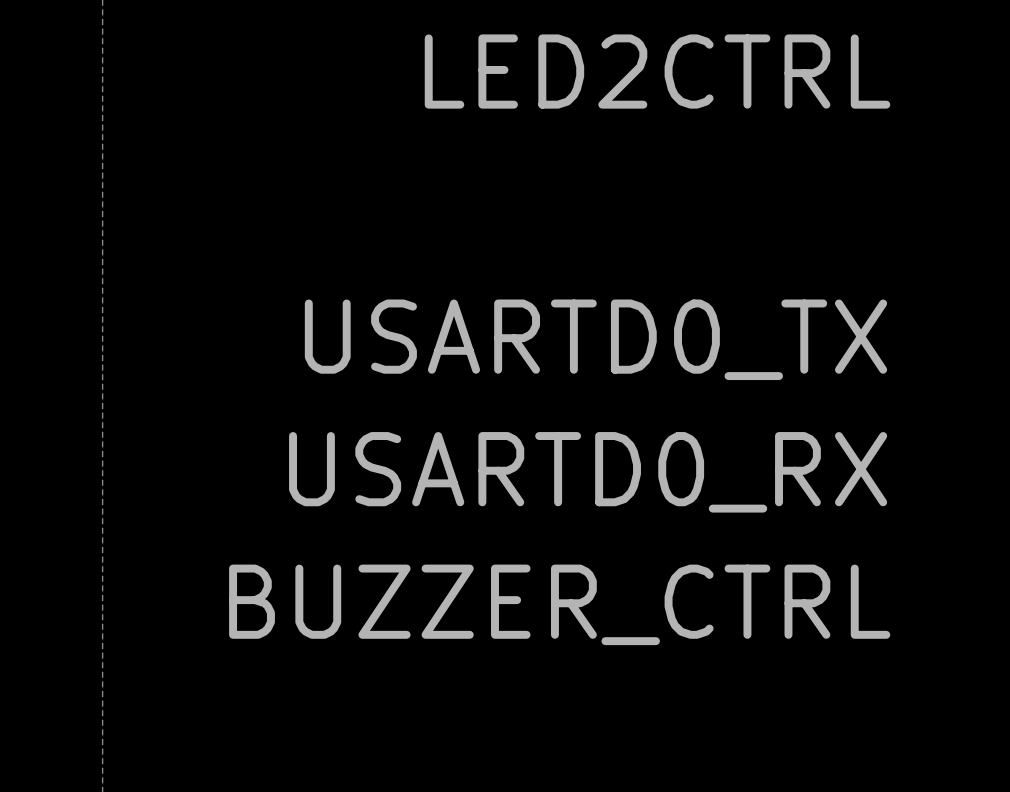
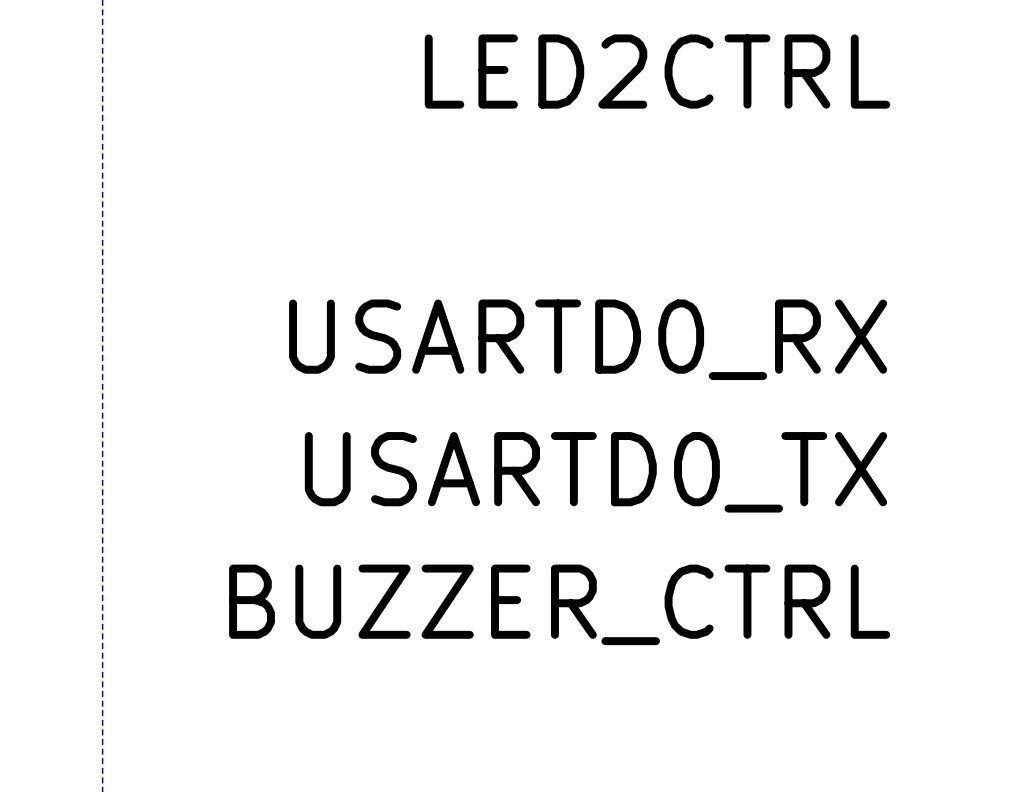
label: USARTD0_TX (595, 339) -> USARTD0_RX (588, 339)
label: USARTD0_RX (588, 472) -> USARTD0_TX (595, 472)

